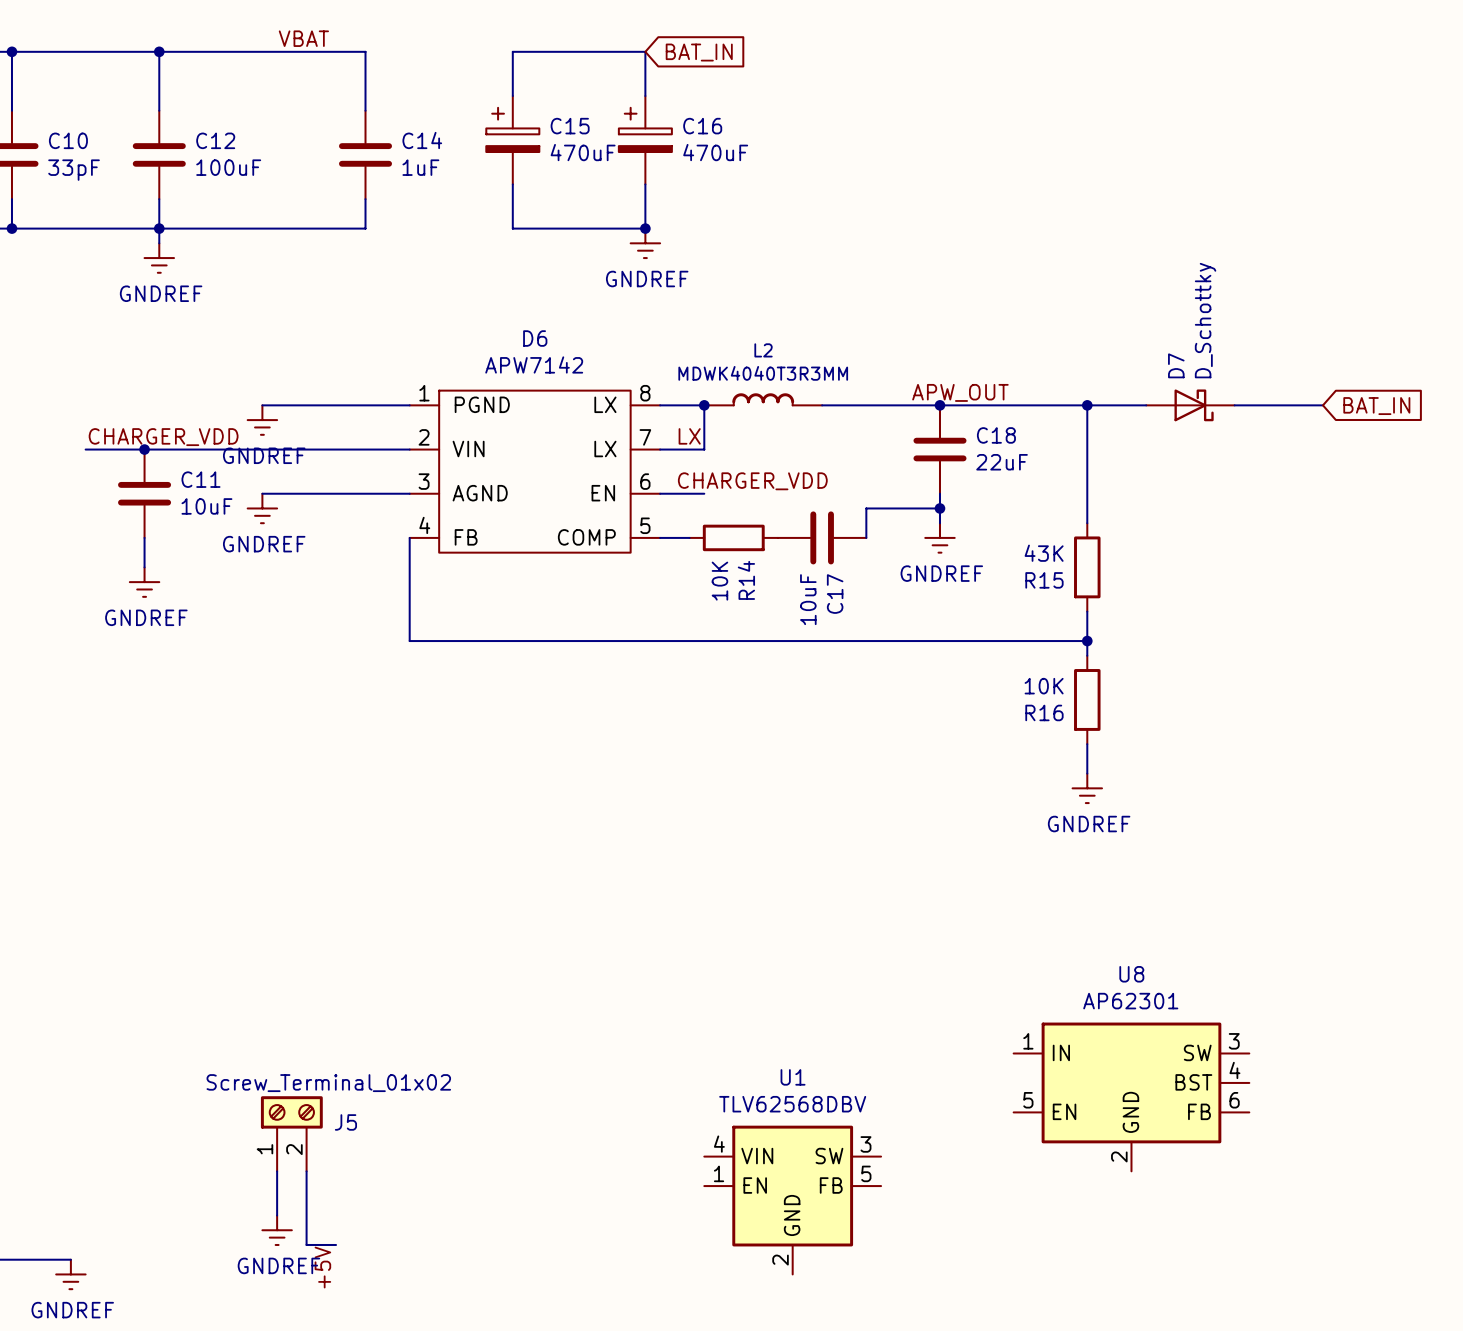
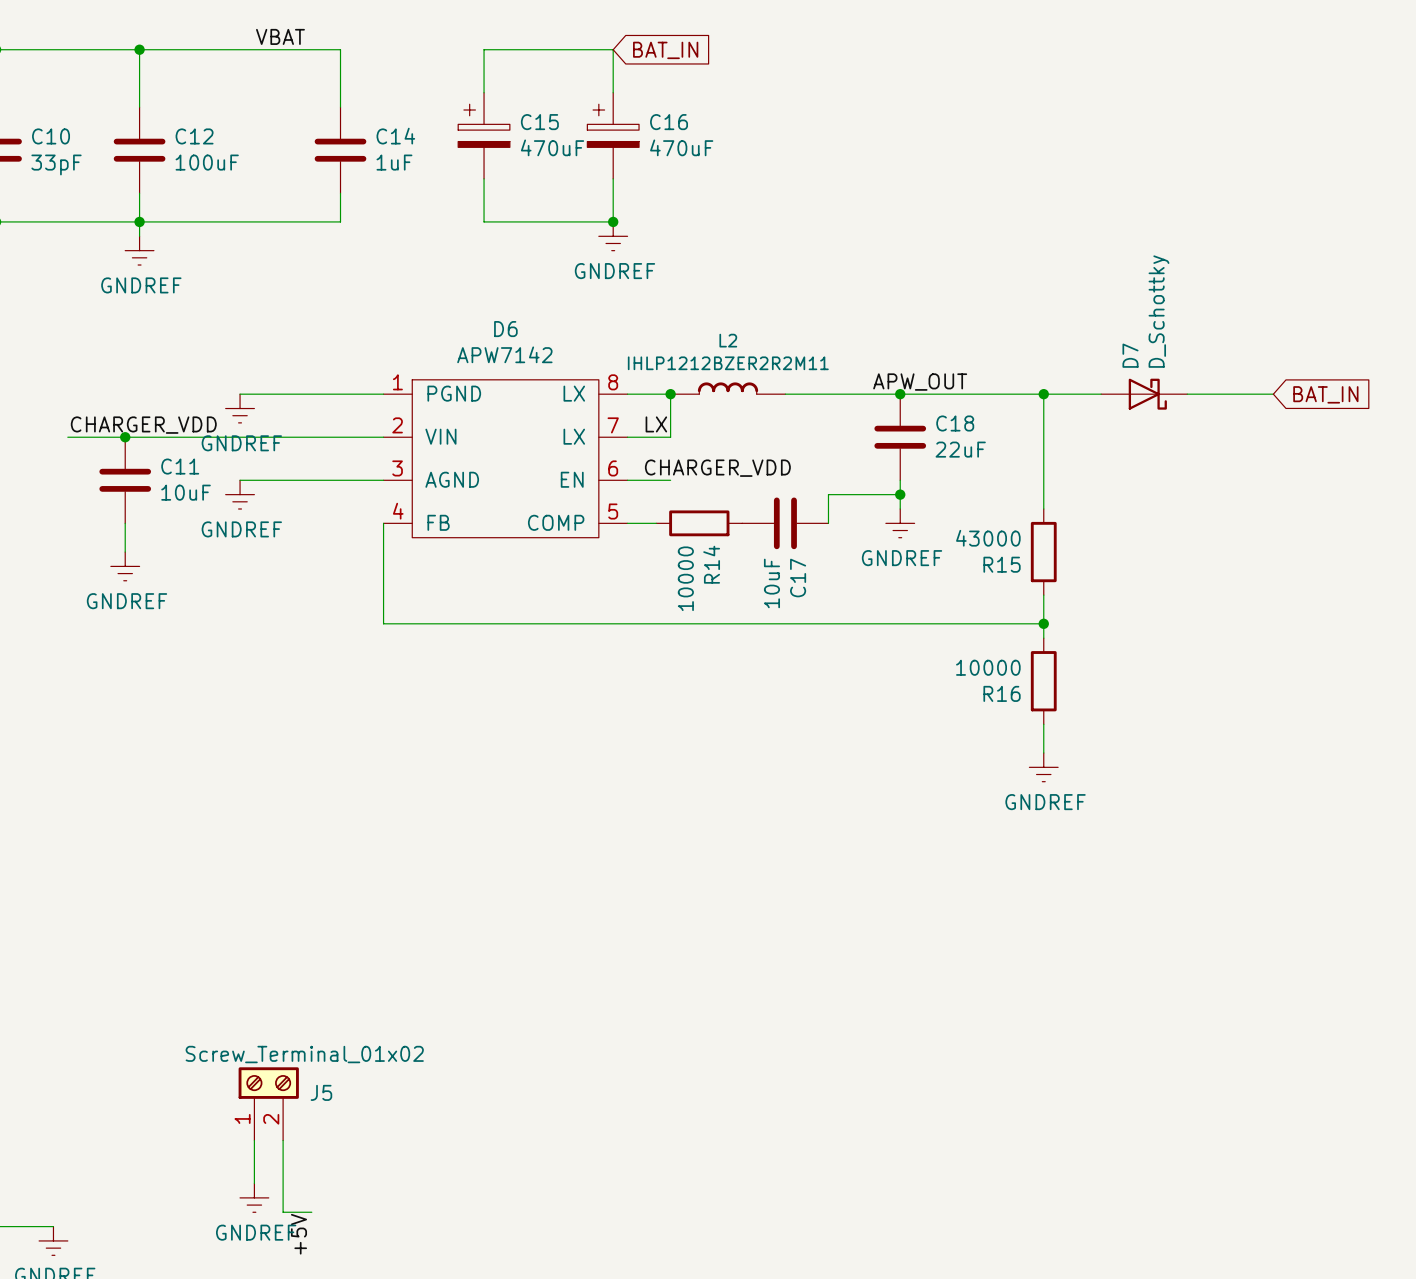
L2 value: MDWK4040T3R3MM (763, 373) -> IHLP1212BZER2R2M11 (728, 363)
R15 value: 43K (1044, 553) -> 43000 (988, 538)
R14 value: 10K (719, 581) -> 10000 (685, 578)
R16 value: 10K (1044, 686) -> 10000 (988, 667)
U8: AP62301 (1131, 1096) -> none
U1: TLV62568DBV (792, 1200) -> none

